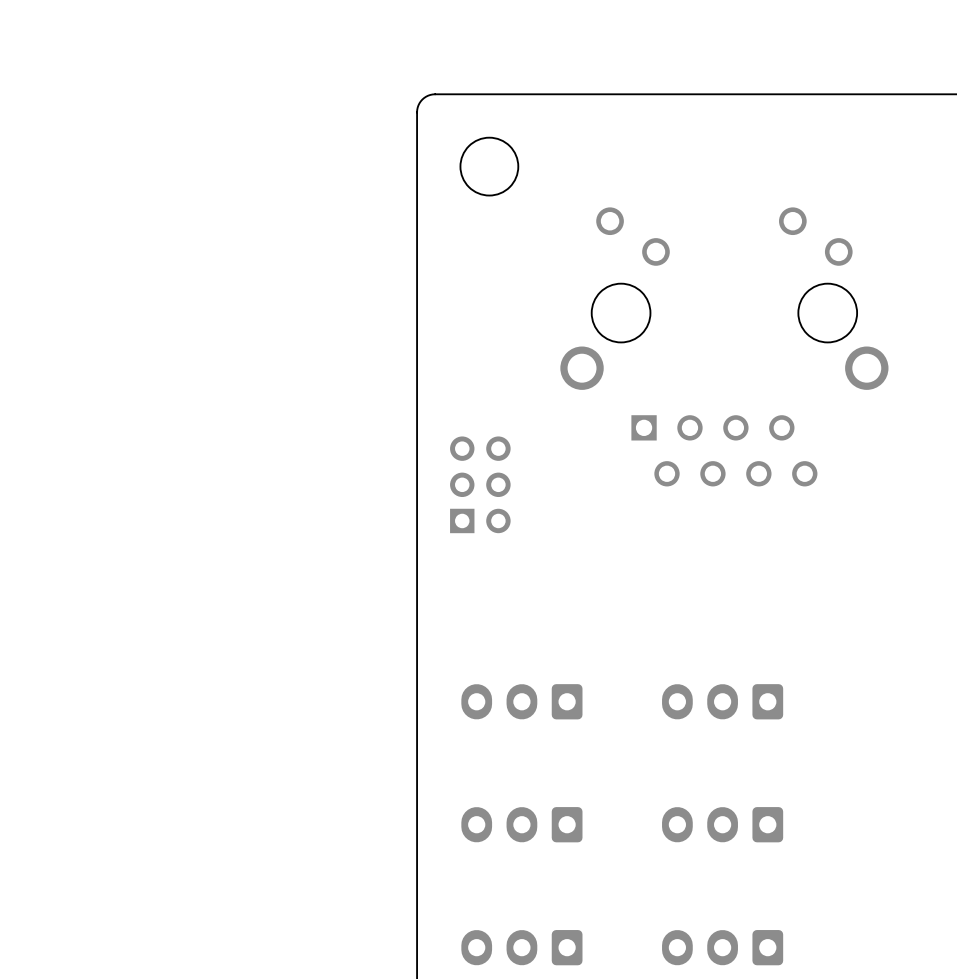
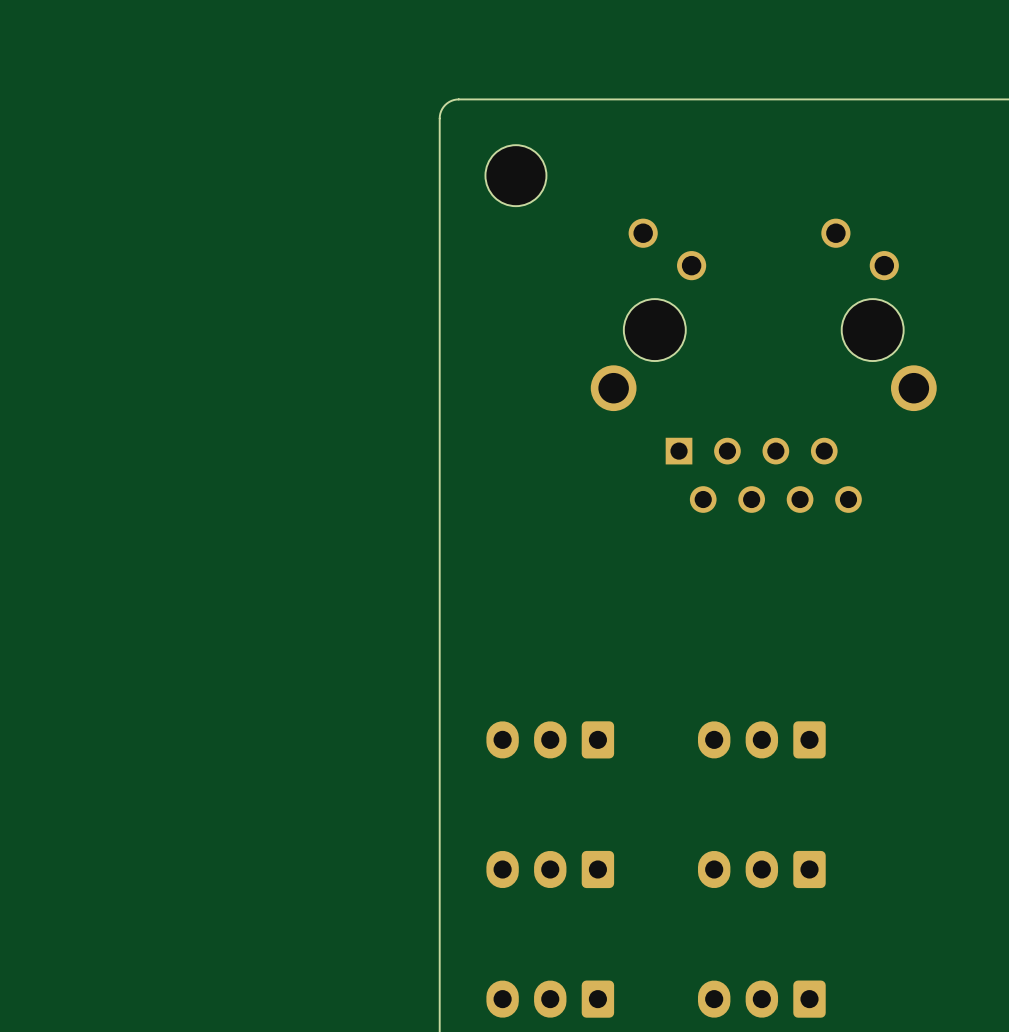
part: (480, 484) -> none

